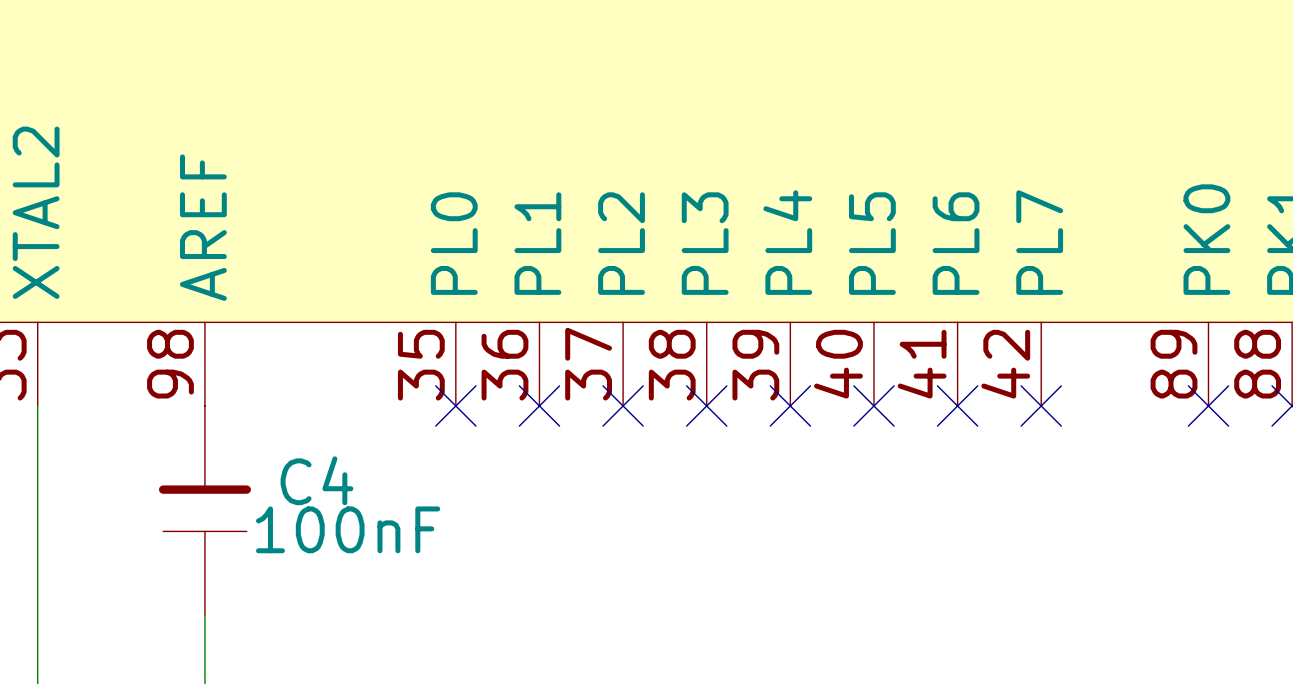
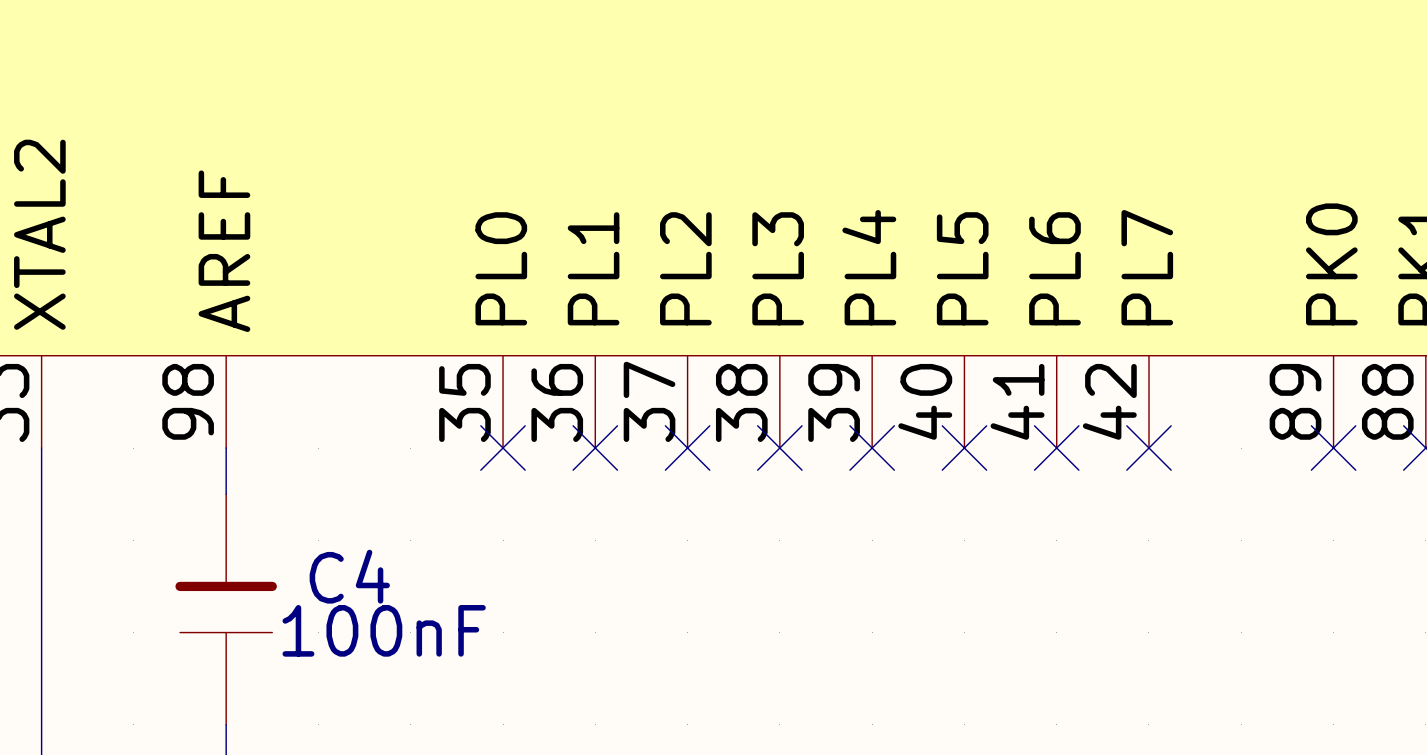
C4 position: (204, 510) -> (226, 609)

